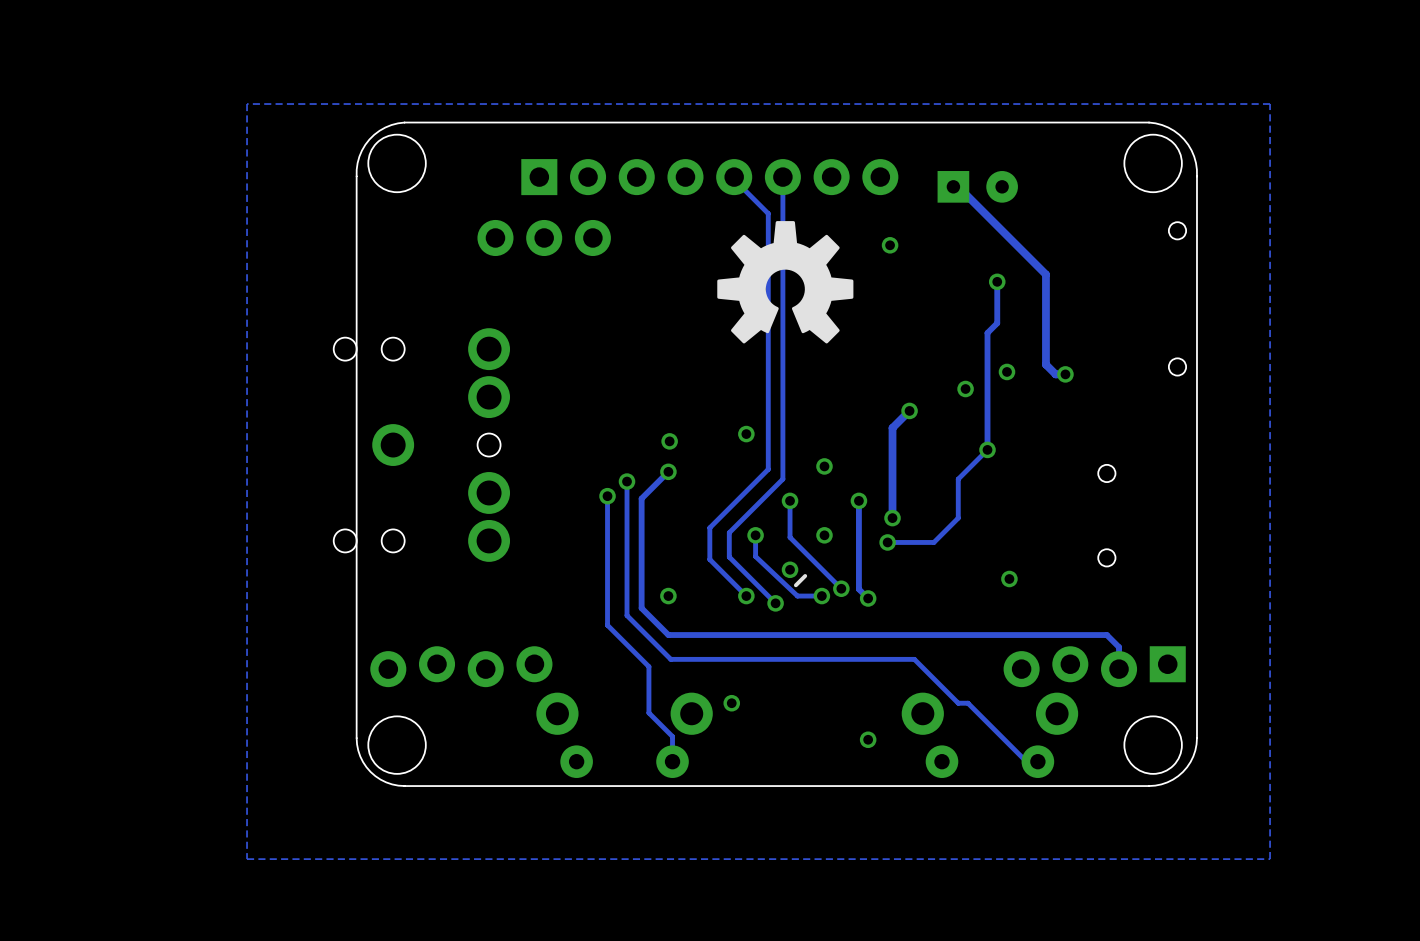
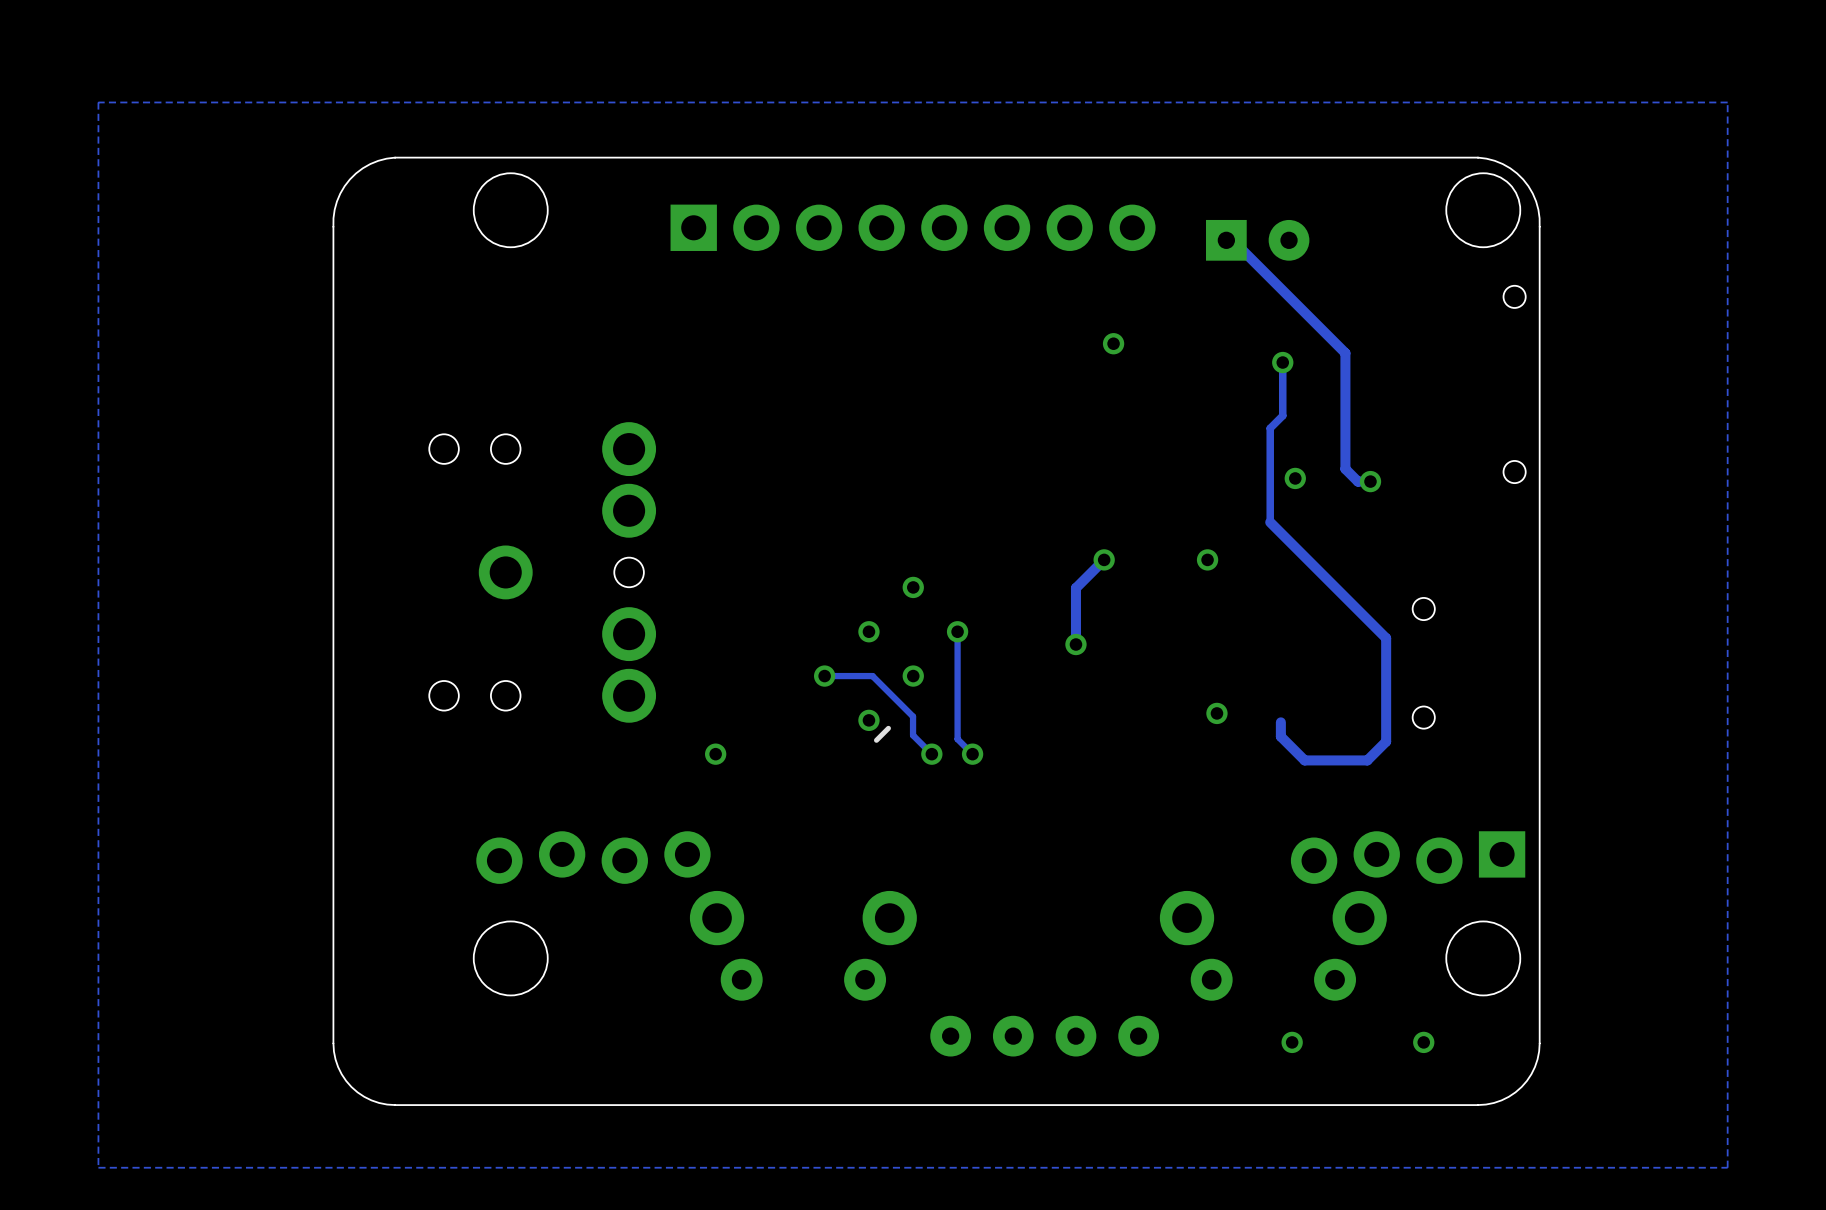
zone outline: (1270, 104) (1270, 859) (247, 859) (247, 104) (1270, 104) -> (1727, 102) (1727, 1167) (98, 1167) (98, 102) (1727, 102)
board edge: (404, 122) (385, 127) (369, 139) (359, 156) (356, 169) (356, 738) (358, 750) (363, 762) (375, 776) (386, 782) (404, 786) (1149, 786) (1167, 782) (1182, 772) (1193, 756) (1196, 738) -> (520, 157) (395, 157) (378, 160) (362, 168) (349, 179) (340, 193) (334, 209) (333, 1043) (335, 1059) (341, 1074) (357, 1092) (371, 1100) (395, 1105) (1486, 1104) (1501, 1100) (1515, 1092) (1526, 1080) (1534, 1067) (1539, 1043) (1539, 949)
track: (734, 177) (734, 179) (768, 213) (768, 469) (709, 527) (709, 557) -> (824, 676) (872, 676) (913, 716)
track: (782, 177) (782, 479) (729, 532) (729, 557) (775, 603) -> none
drawing: [717, 221, 854, 344] -> none
part: (544, 237) -> none
via position: (890, 245) -> (1113, 343)
via: (965, 389) -> none
track: (987, 406) (987, 449) (958, 479) (958, 518) (933, 542) (887, 542) -> (1270, 522) (1386, 638) (1386, 741) (1367, 760) (1304, 760) (1280, 736) (1280, 722)
track: (909, 410) (892, 427) (892, 518) -> none
via: (909, 410) -> none
via: (746, 434) -> none
track: none -> (1104, 559) (1075, 588) (1075, 644)
via: none -> (1104, 559)
via: none -> (1207, 559)
via: (669, 441) -> none
via: (987, 449) -> none
track: (668, 471) (641, 498) (641, 608) (668, 635) (1106, 635) (1119, 647) (1119, 669) -> none
via: (668, 471) -> none
track: (627, 481) (627, 615) (670, 659) (914, 659) (958, 703) (968, 703) (1026, 761) (1037, 761) -> none
via: (627, 481) -> none
track: none -> (957, 631) (957, 739) (972, 754)
track: (607, 496) (607, 625) (648, 666) (648, 712) (672, 736) (672, 761) -> none
via: (607, 496) -> none
track: (790, 500) (790, 537) (841, 588) -> none
track: (858, 500) (858, 589) (868, 598) -> none
via: none -> (1075, 644)
via: (892, 518) -> none
part position: (807, 522) -> (891, 659)
track: (755, 535) (755, 556) (797, 596) (821, 596) -> none
via: (887, 542) -> none
via: none -> (1216, 713)
track: (709, 559) (746, 596) -> (913, 719) (913, 735) (931, 754)
via: (1009, 579) -> none
via: none -> (715, 754)
via: none -> (931, 754)
via: (841, 588) -> none
via: (668, 596) -> none
via position: (746, 596) -> (972, 754)
via: (821, 596) -> none
via: (868, 598) -> none
via: (775, 603) -> none
via: (731, 703) -> none
via: (868, 739) -> none
part: none -> (981, 1036)
part: none -> (1107, 1036)
via: none -> (1292, 1042)
via: none -> (1423, 1042)

